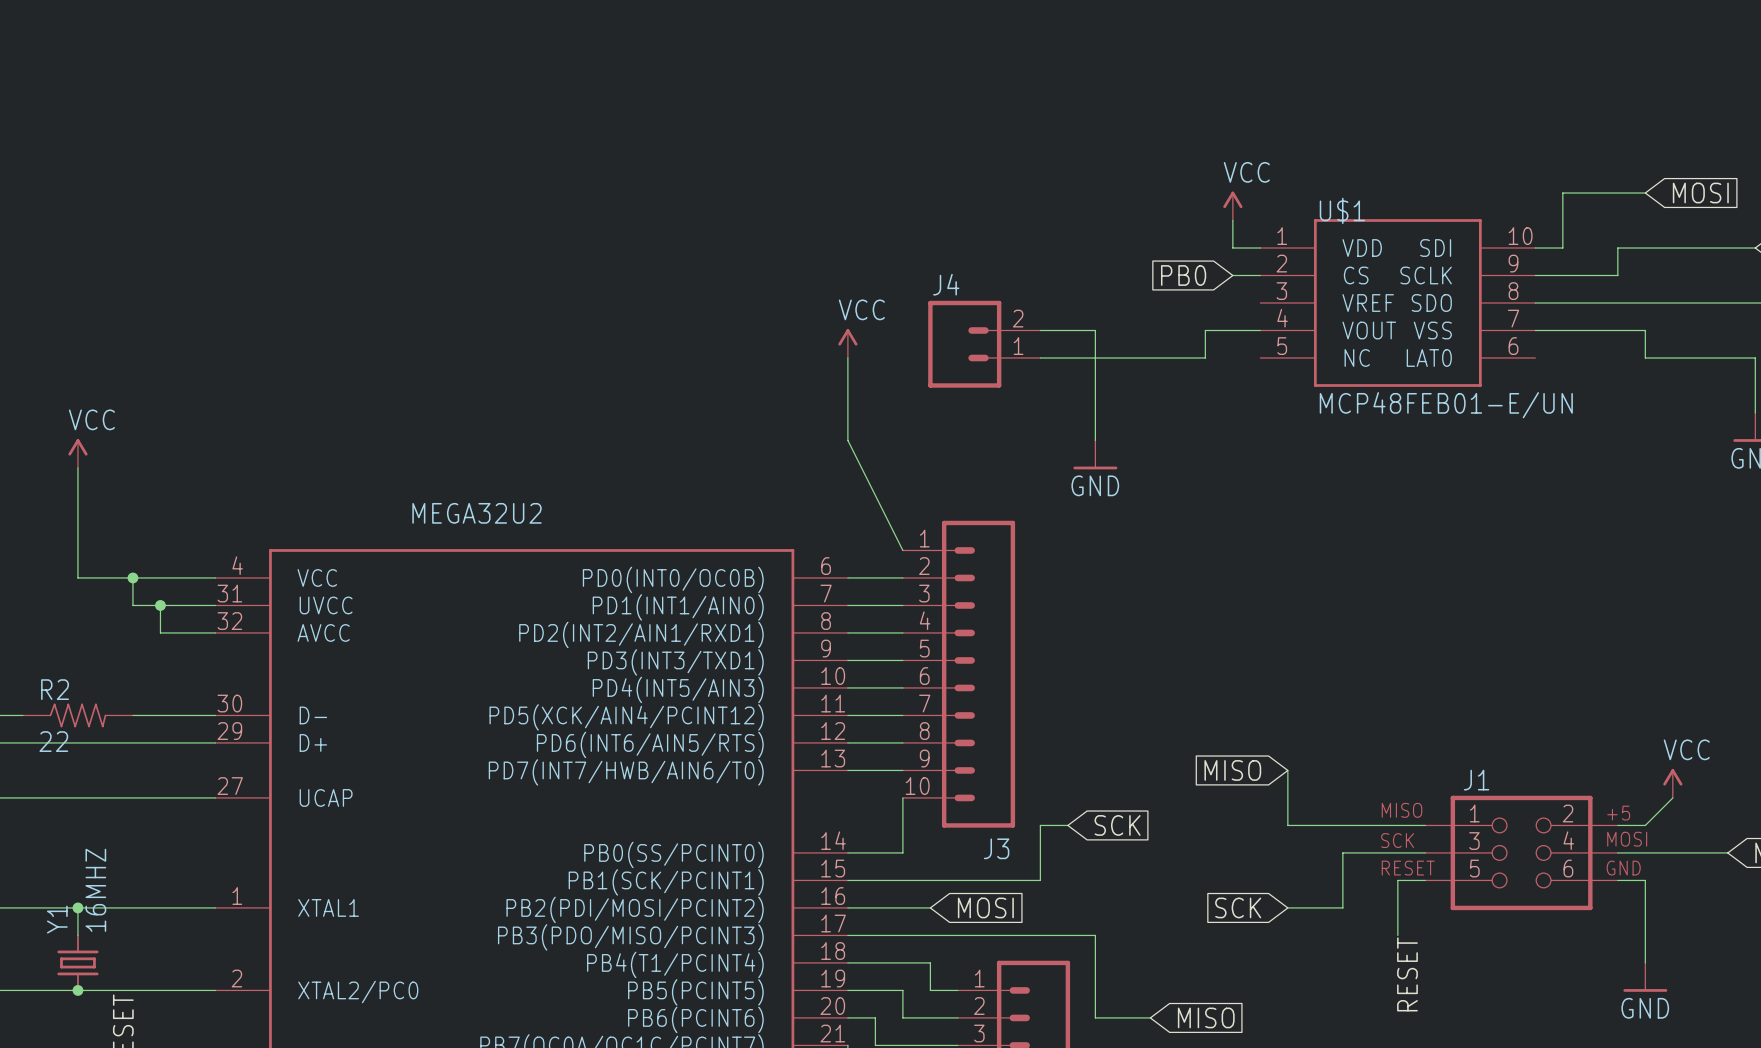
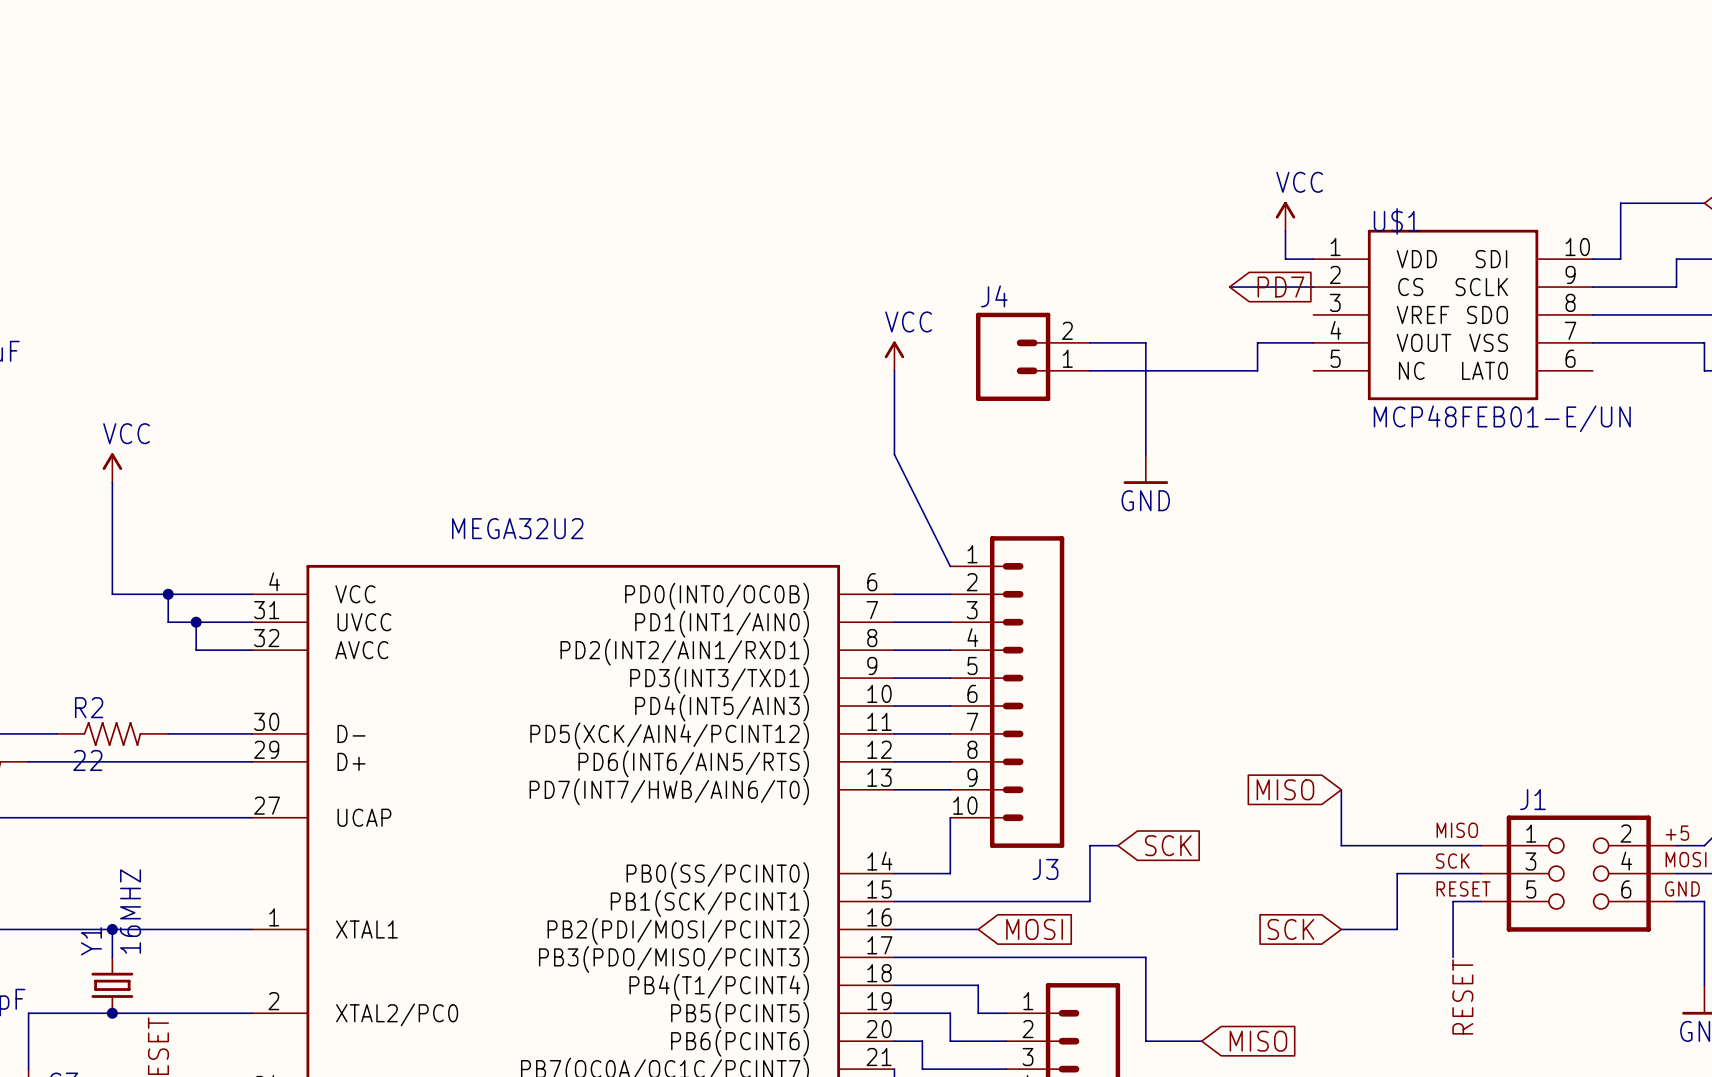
wire: none -> (1229, 287) (1285, 287)
global label: PB0 (1183, 275) -> none
global label: none -> PD7 (1280, 287)

